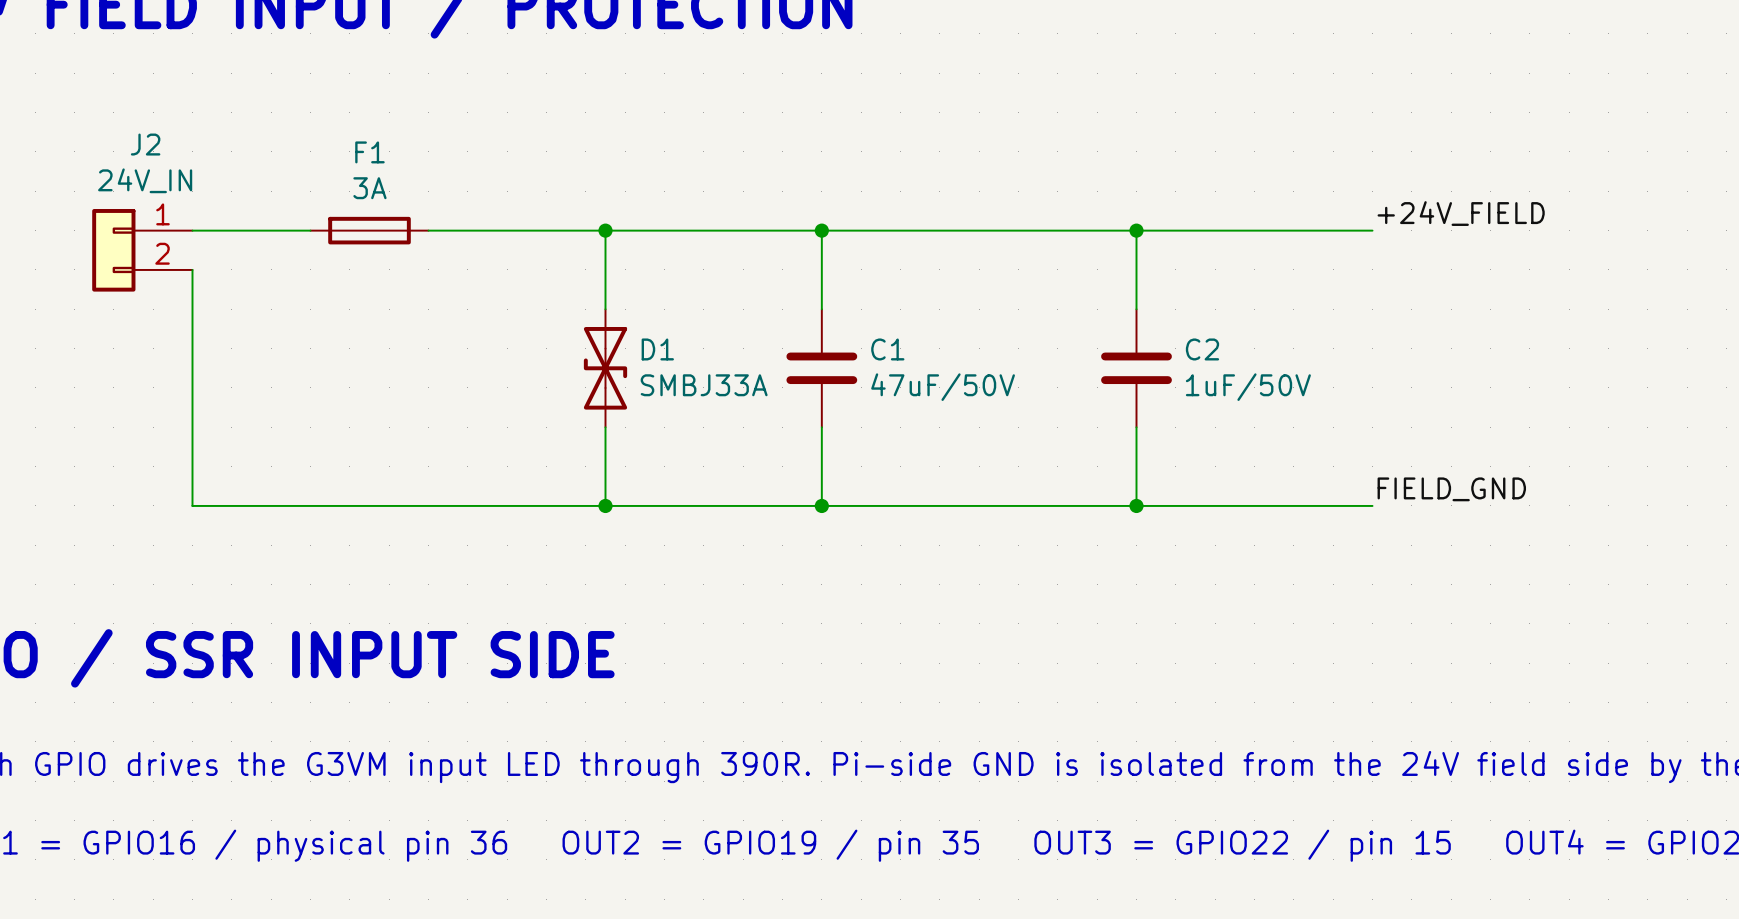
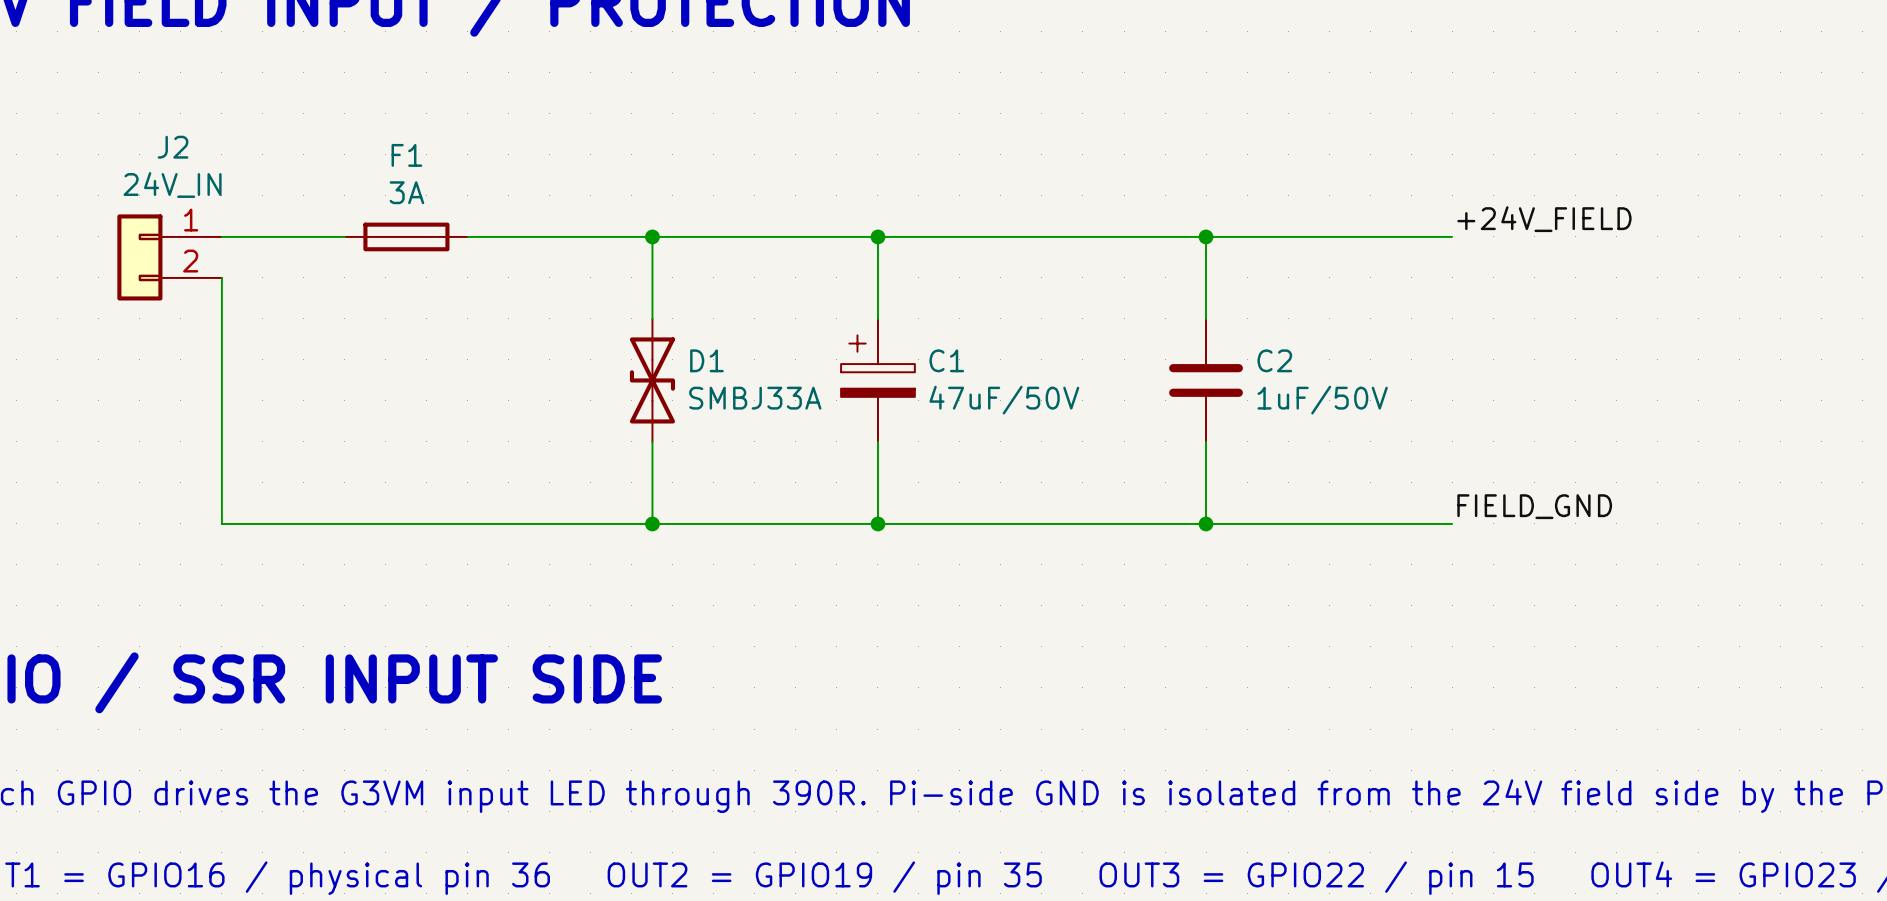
C1 symbol: [786, 309, 858, 428] -> [841, 318, 915, 442]

